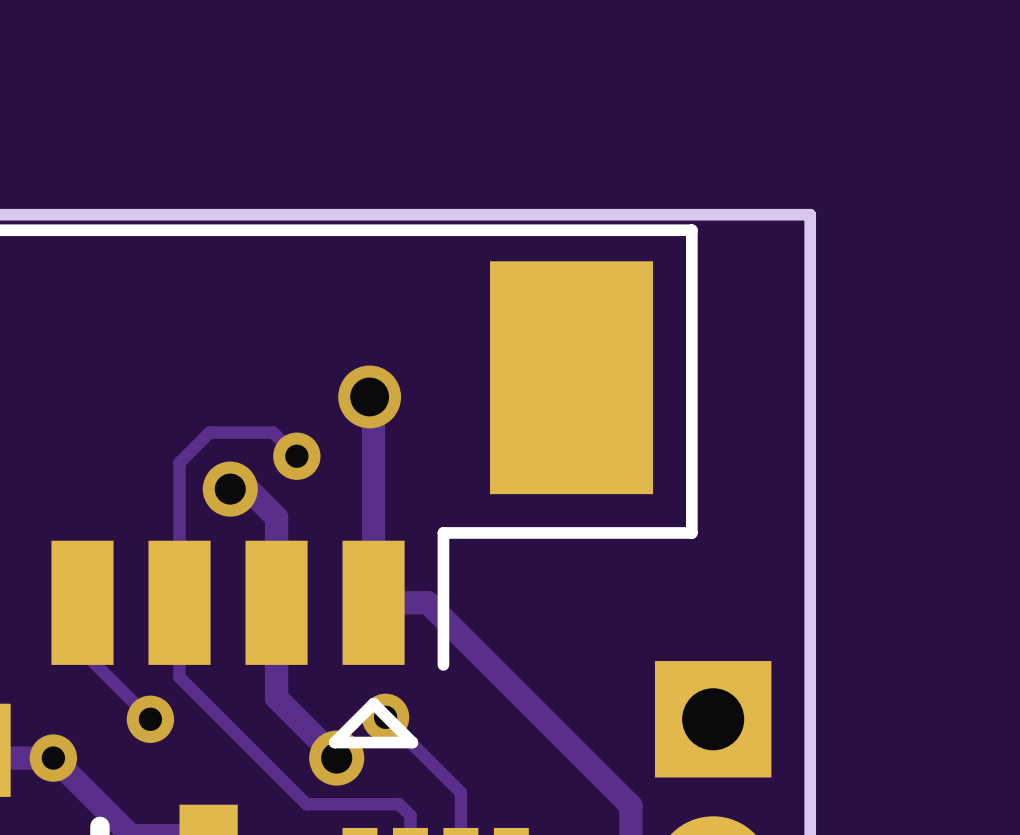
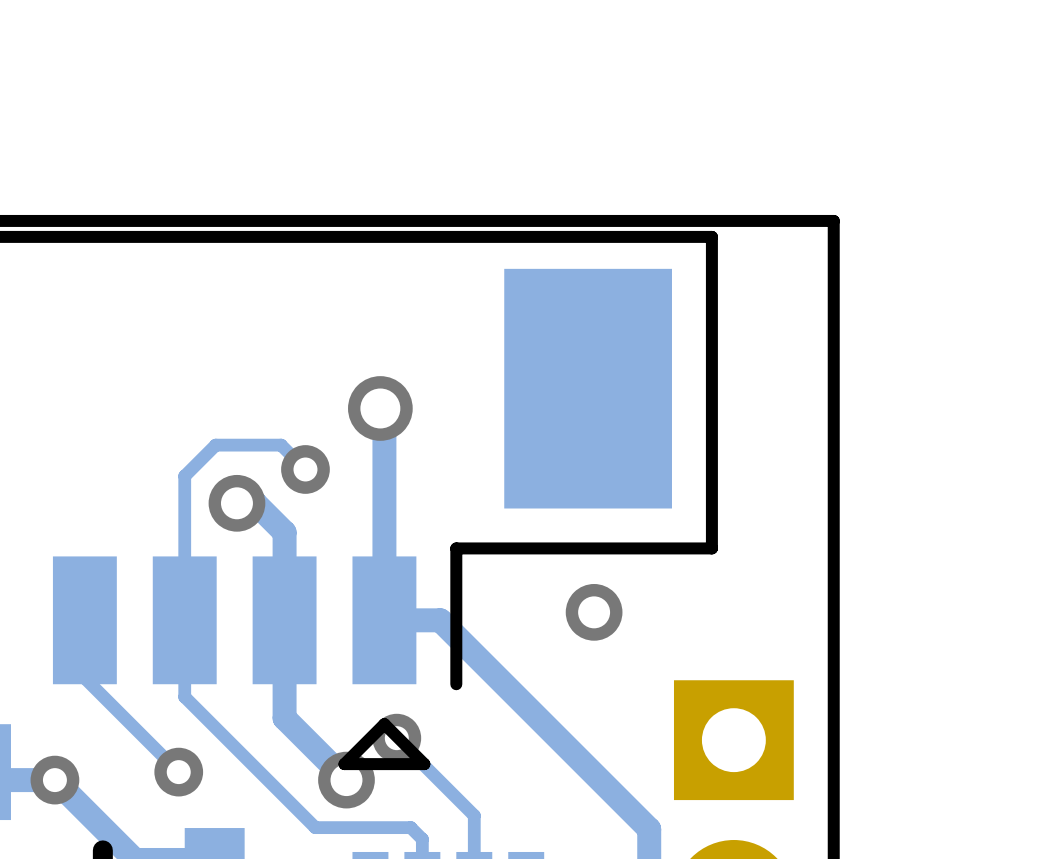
via: none -> (594, 612)
track: (82, 651) (150, 719) -> (84, 670) (84, 678) (178, 772)
via position: (150, 719) -> (178, 772)

